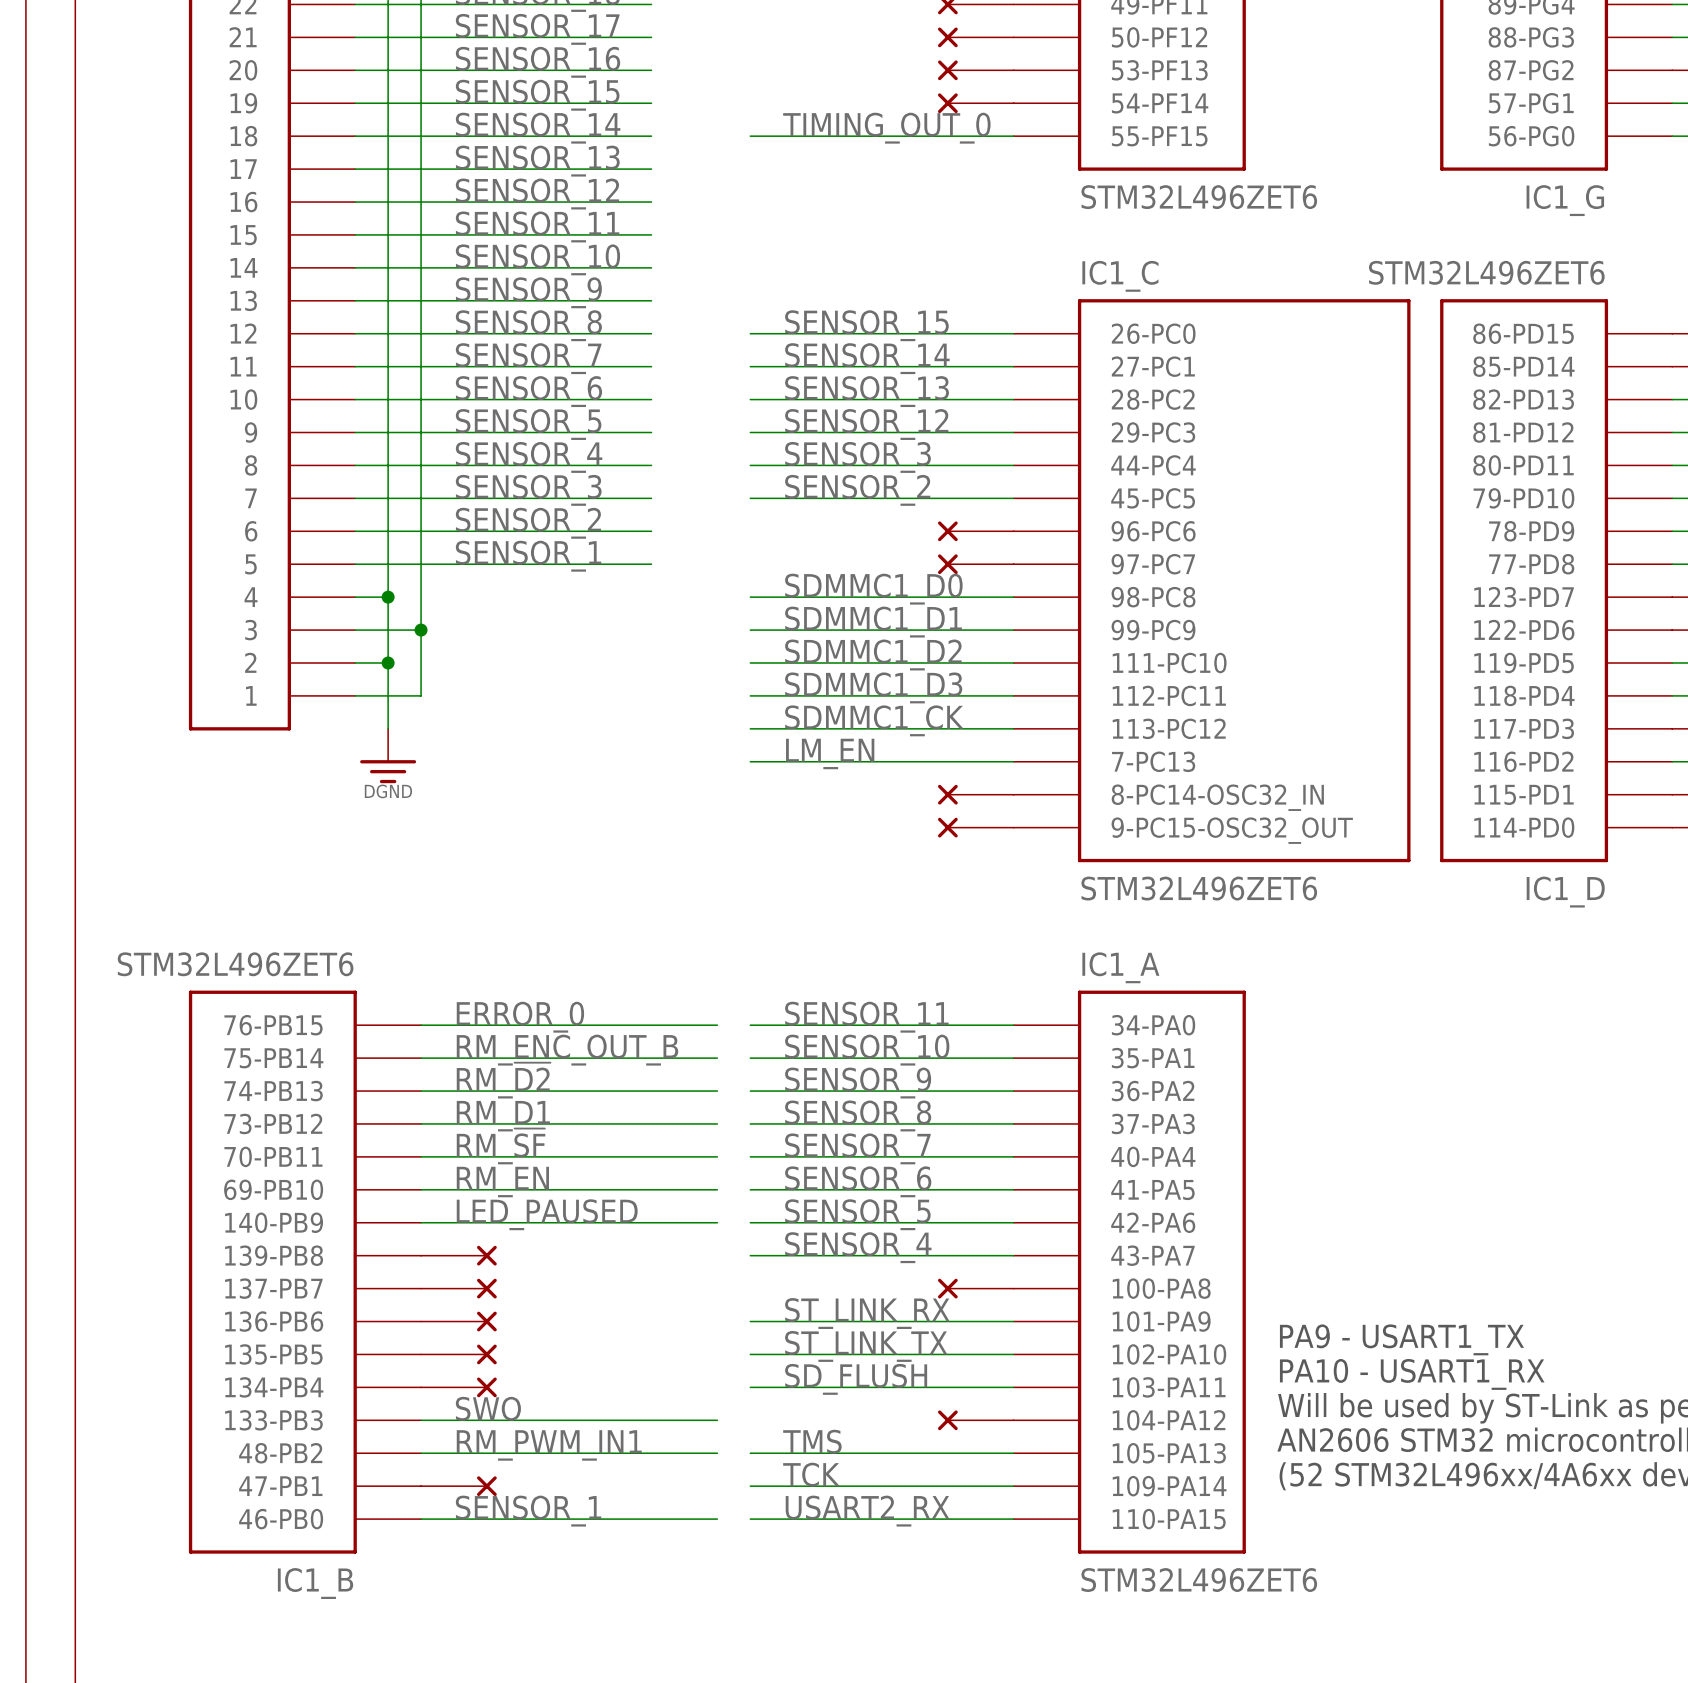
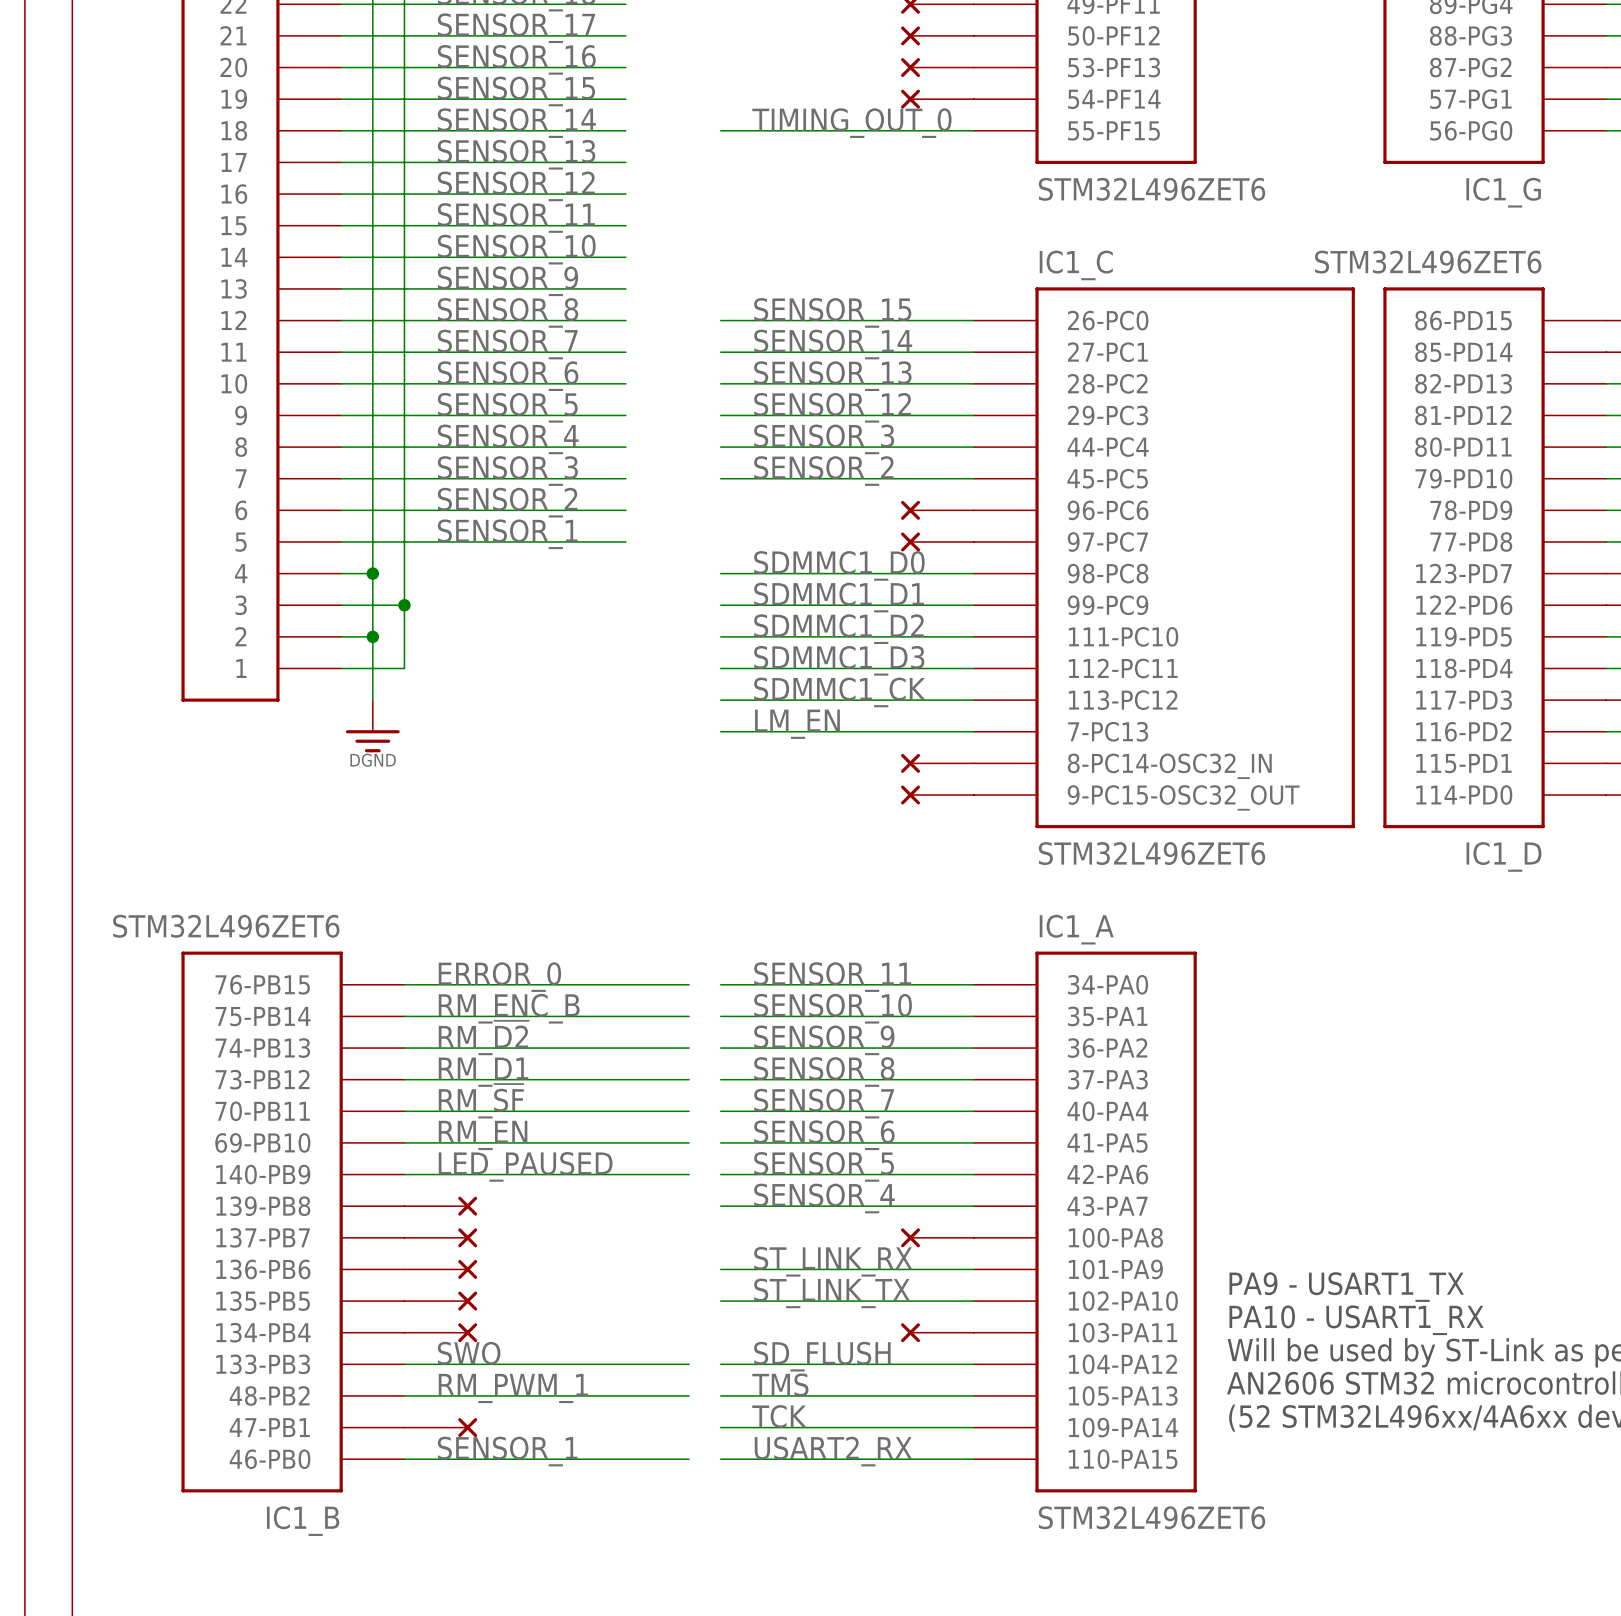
label: RM_ENC_OUT_B (567, 1050) -> RM_ENC_B (509, 1008)
label position: SD_FLUSH (856, 1379) -> SD_FLUSH (822, 1356)
wire: (750, 1387) (1013, 1387) -> (720, 1364) (973, 1364)
part position: (975, 1420) -> (937, 1332)
label: RM_PWM_IN1 (549, 1445) -> RM_PWM_1 (513, 1388)

